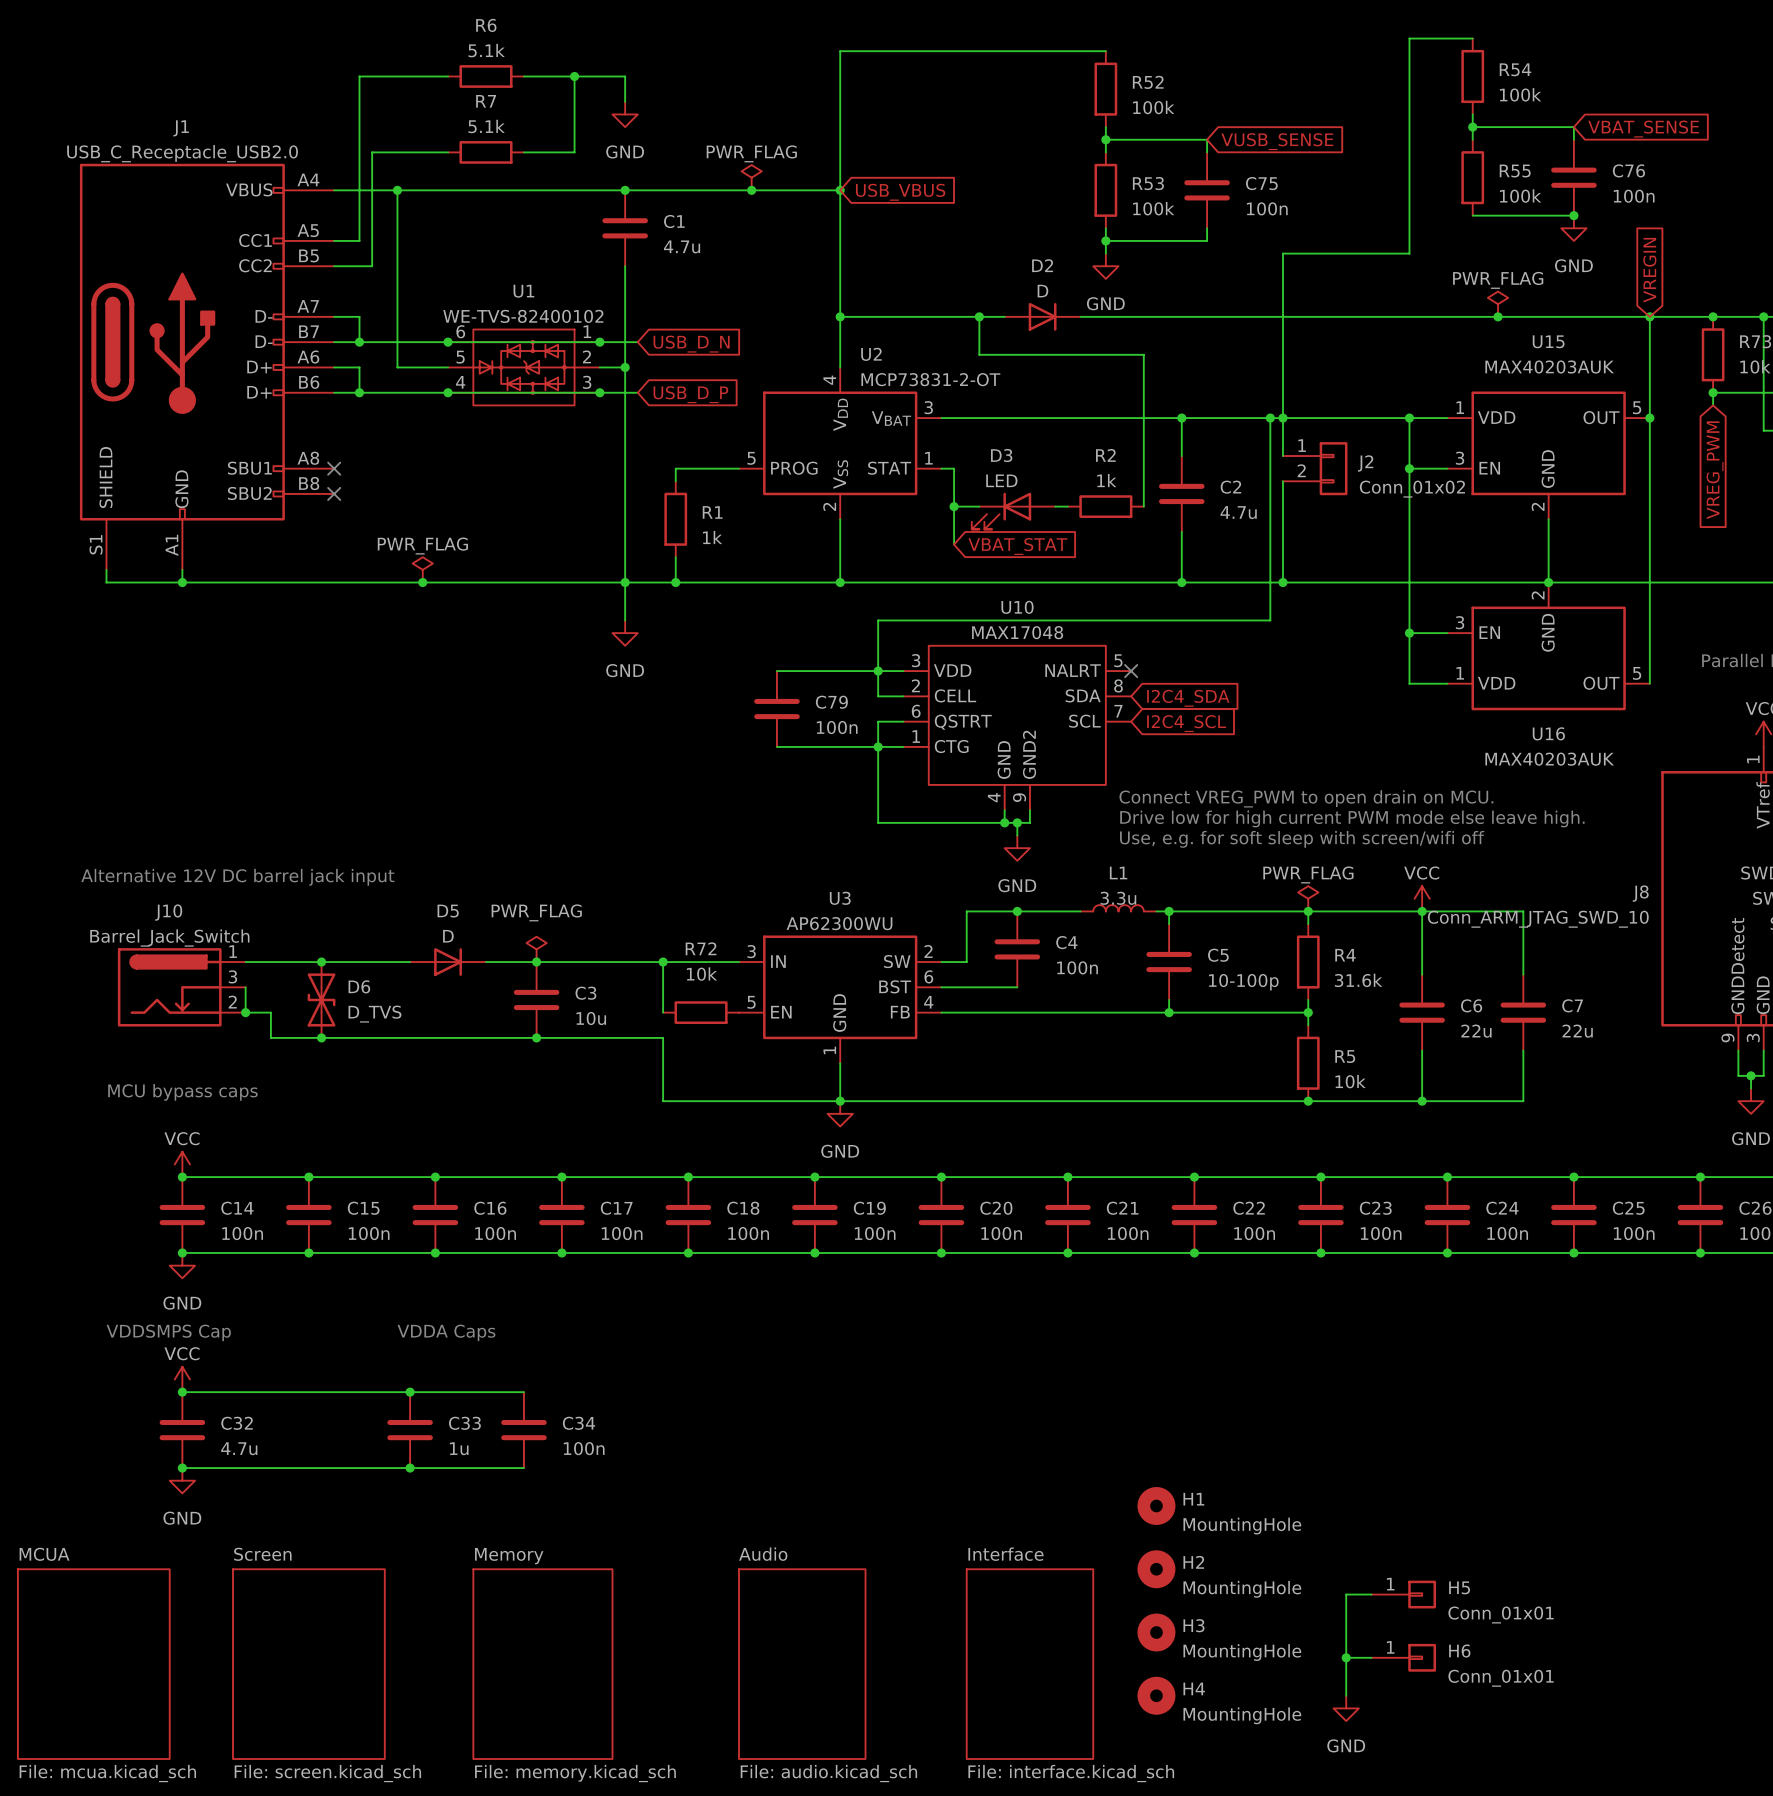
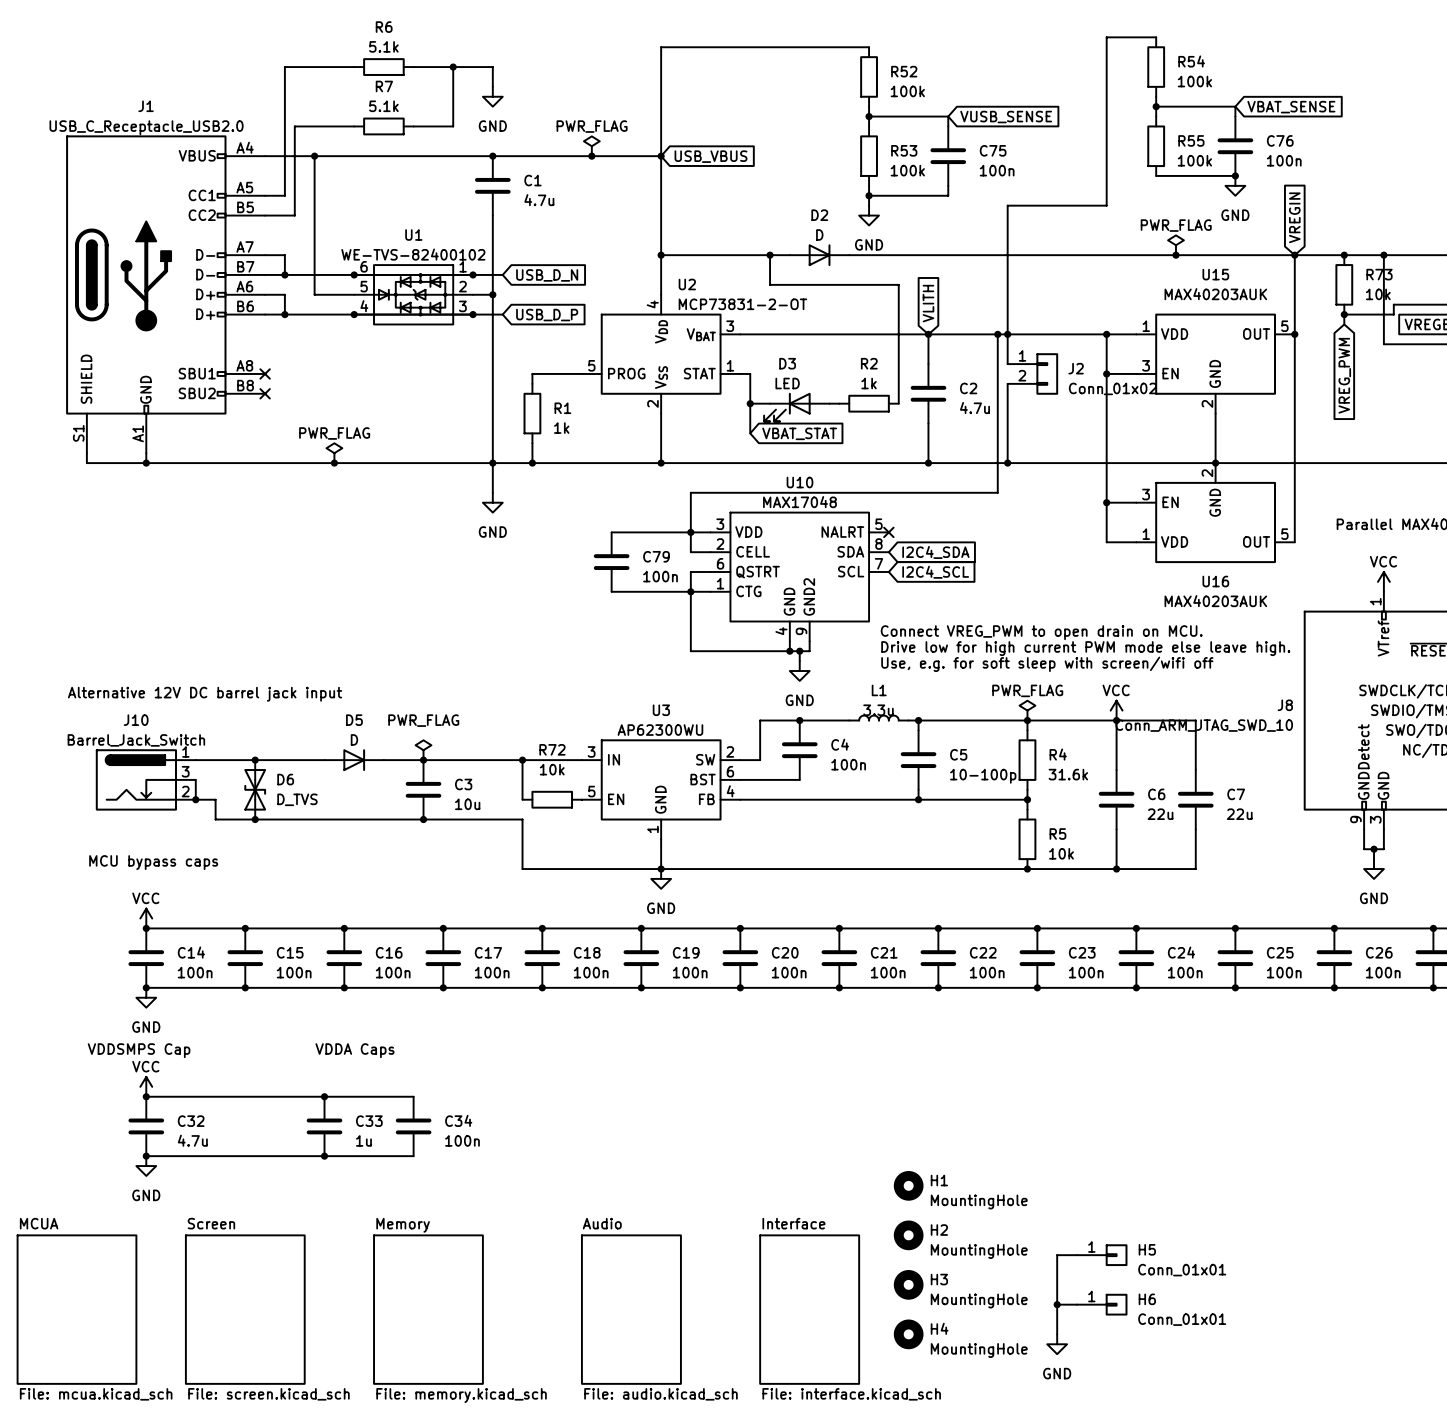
global label: none -> VLITH (928, 303)

